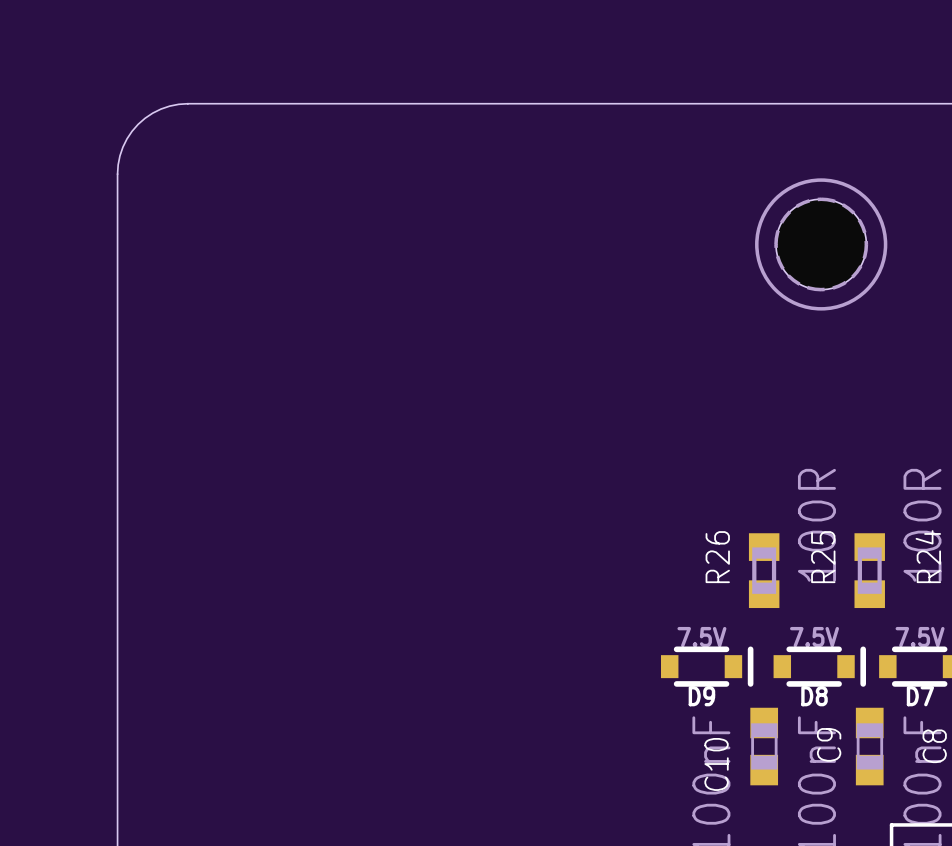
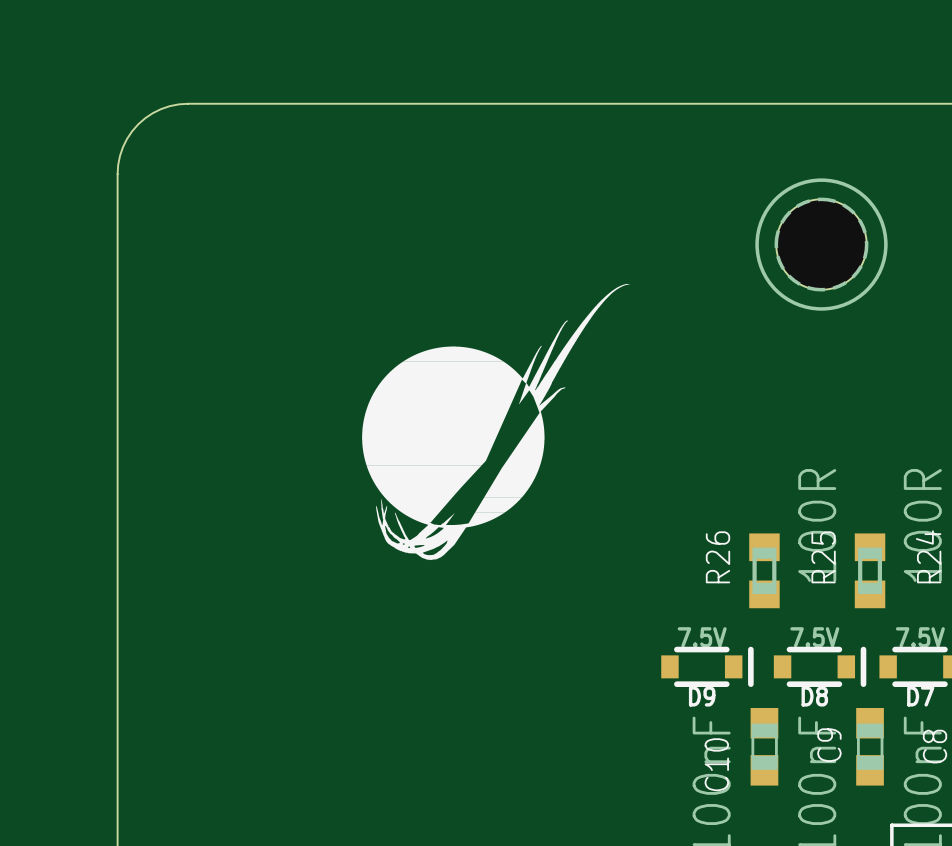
drawing: none -> [362, 283, 630, 561]

